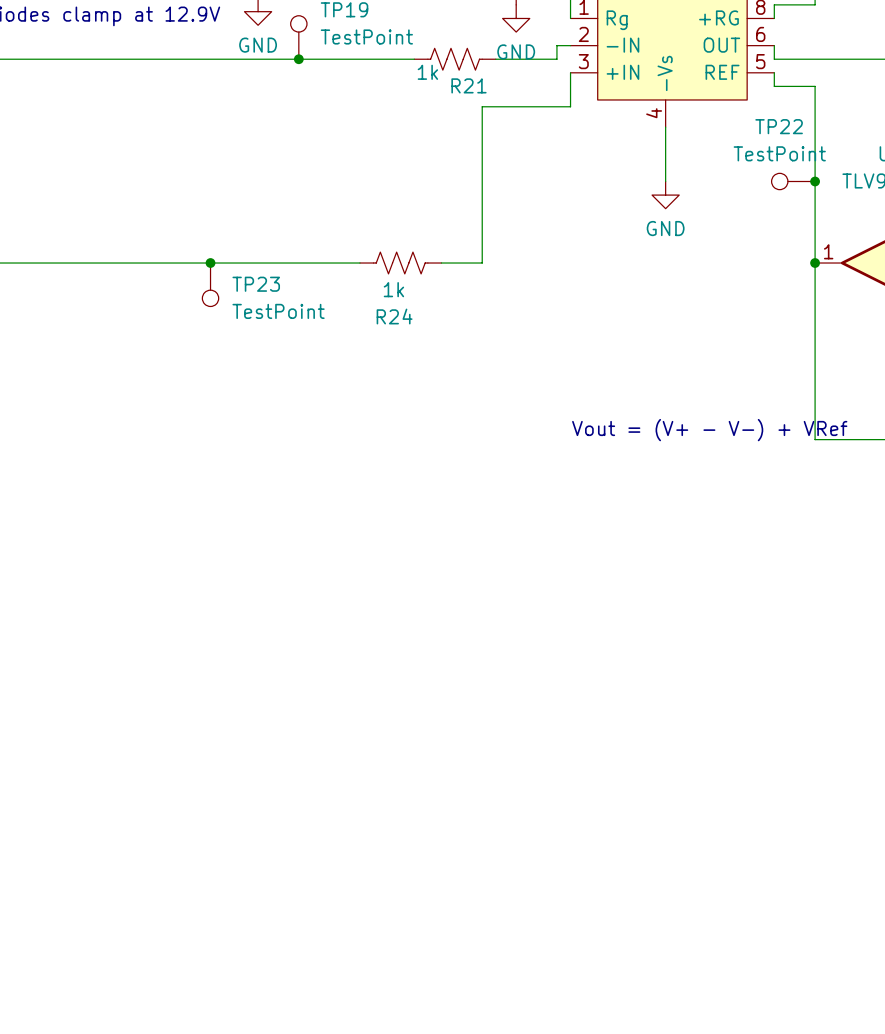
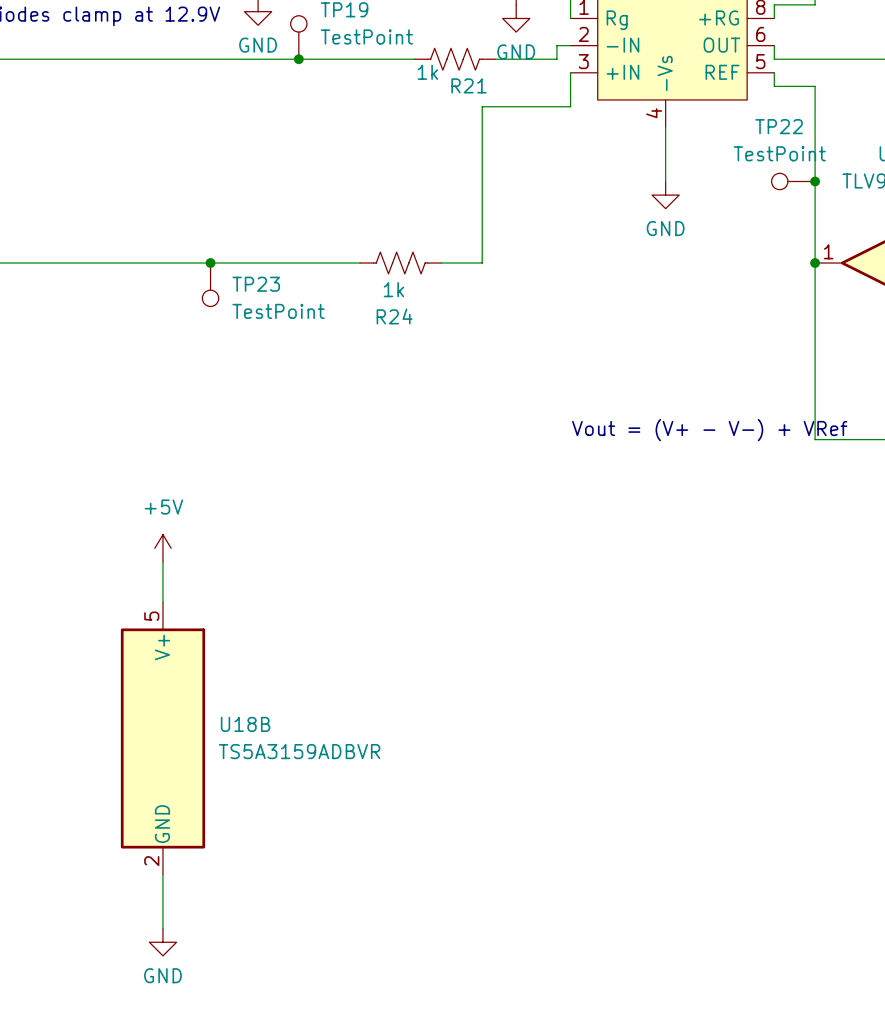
power symbol: none -> +5V (162, 548)
wire: none -> (162, 561) (162, 602)
U18B: none -> TS5A3159ADBVR (162, 738)
wire: none -> (162, 874) (162, 928)
power symbol: none -> GND (162, 942)

